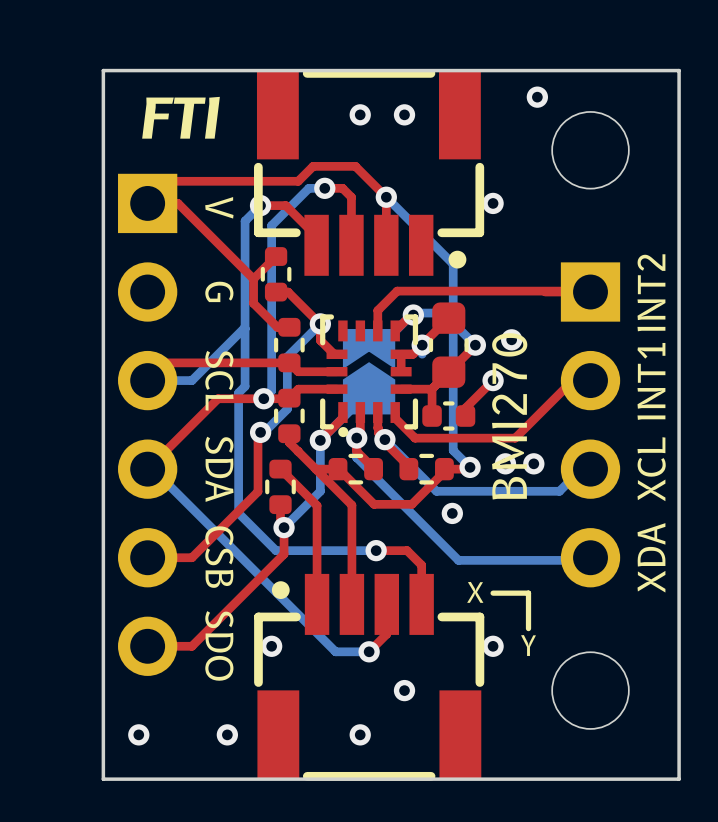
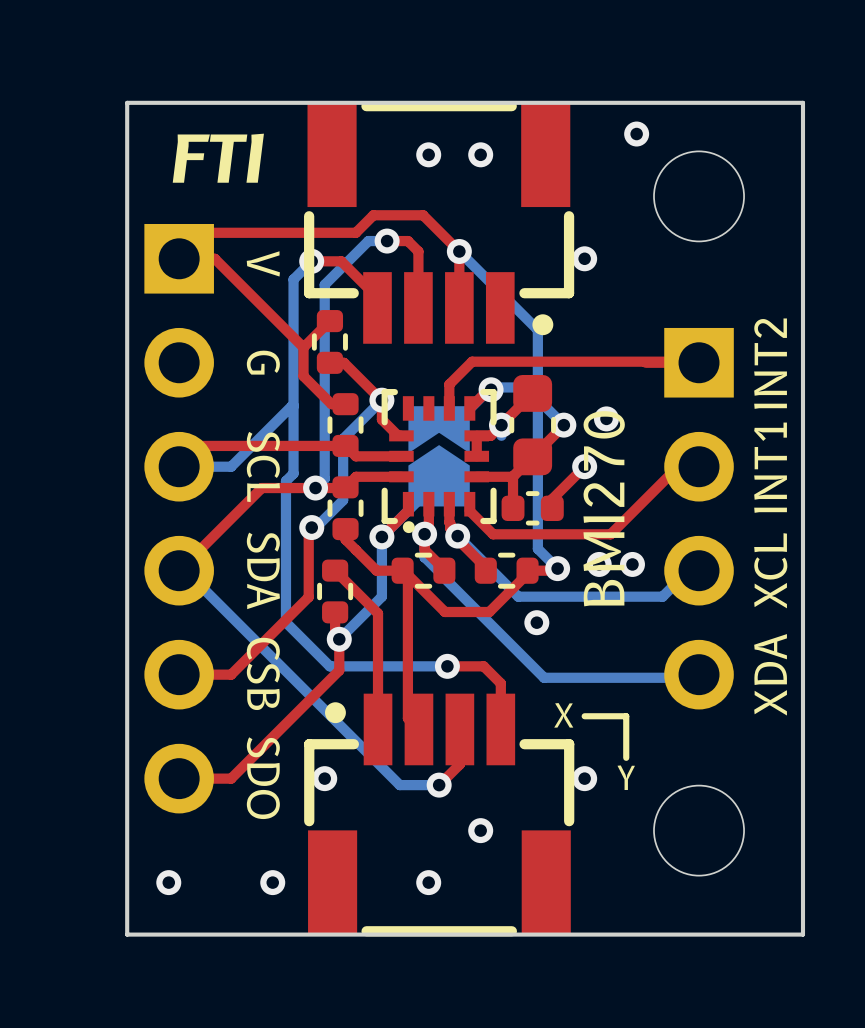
top track: (315, 469) (351, 505) (351, 604) -> (407, 570) (407, 718) (418, 729)

